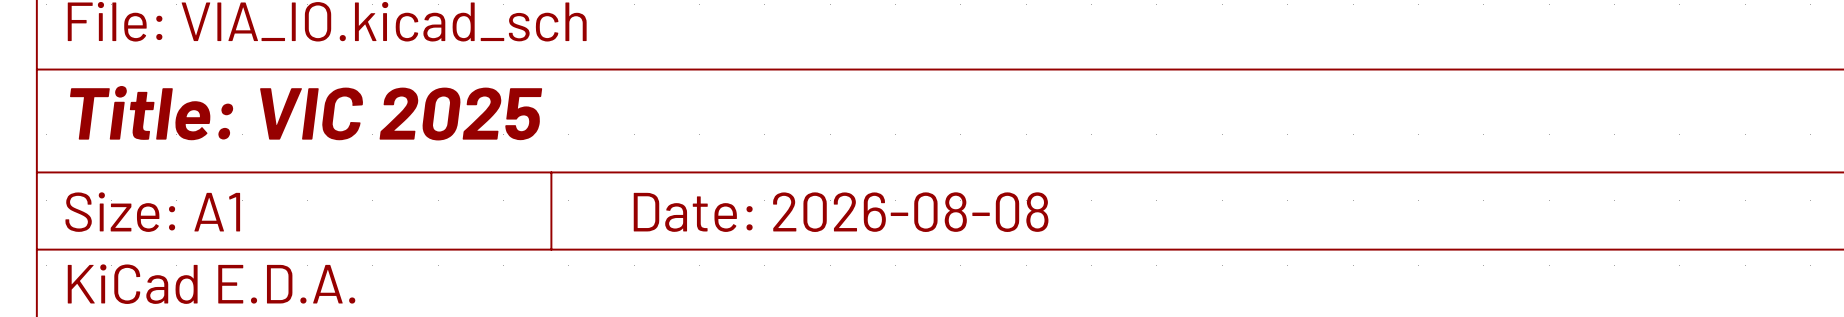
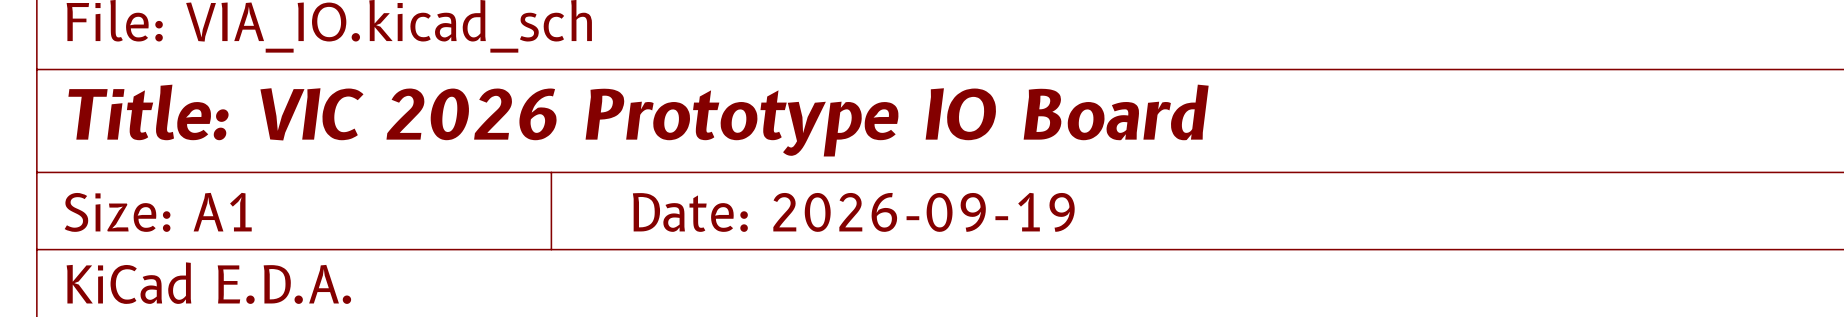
title block: Title: VIC 2025 (306, 113) -> Title: VIC 2026 Prototype IO Board (638, 120)
title block: Date: 2026-08-08 (841, 212) -> Date: 2026-09-19 (853, 212)

